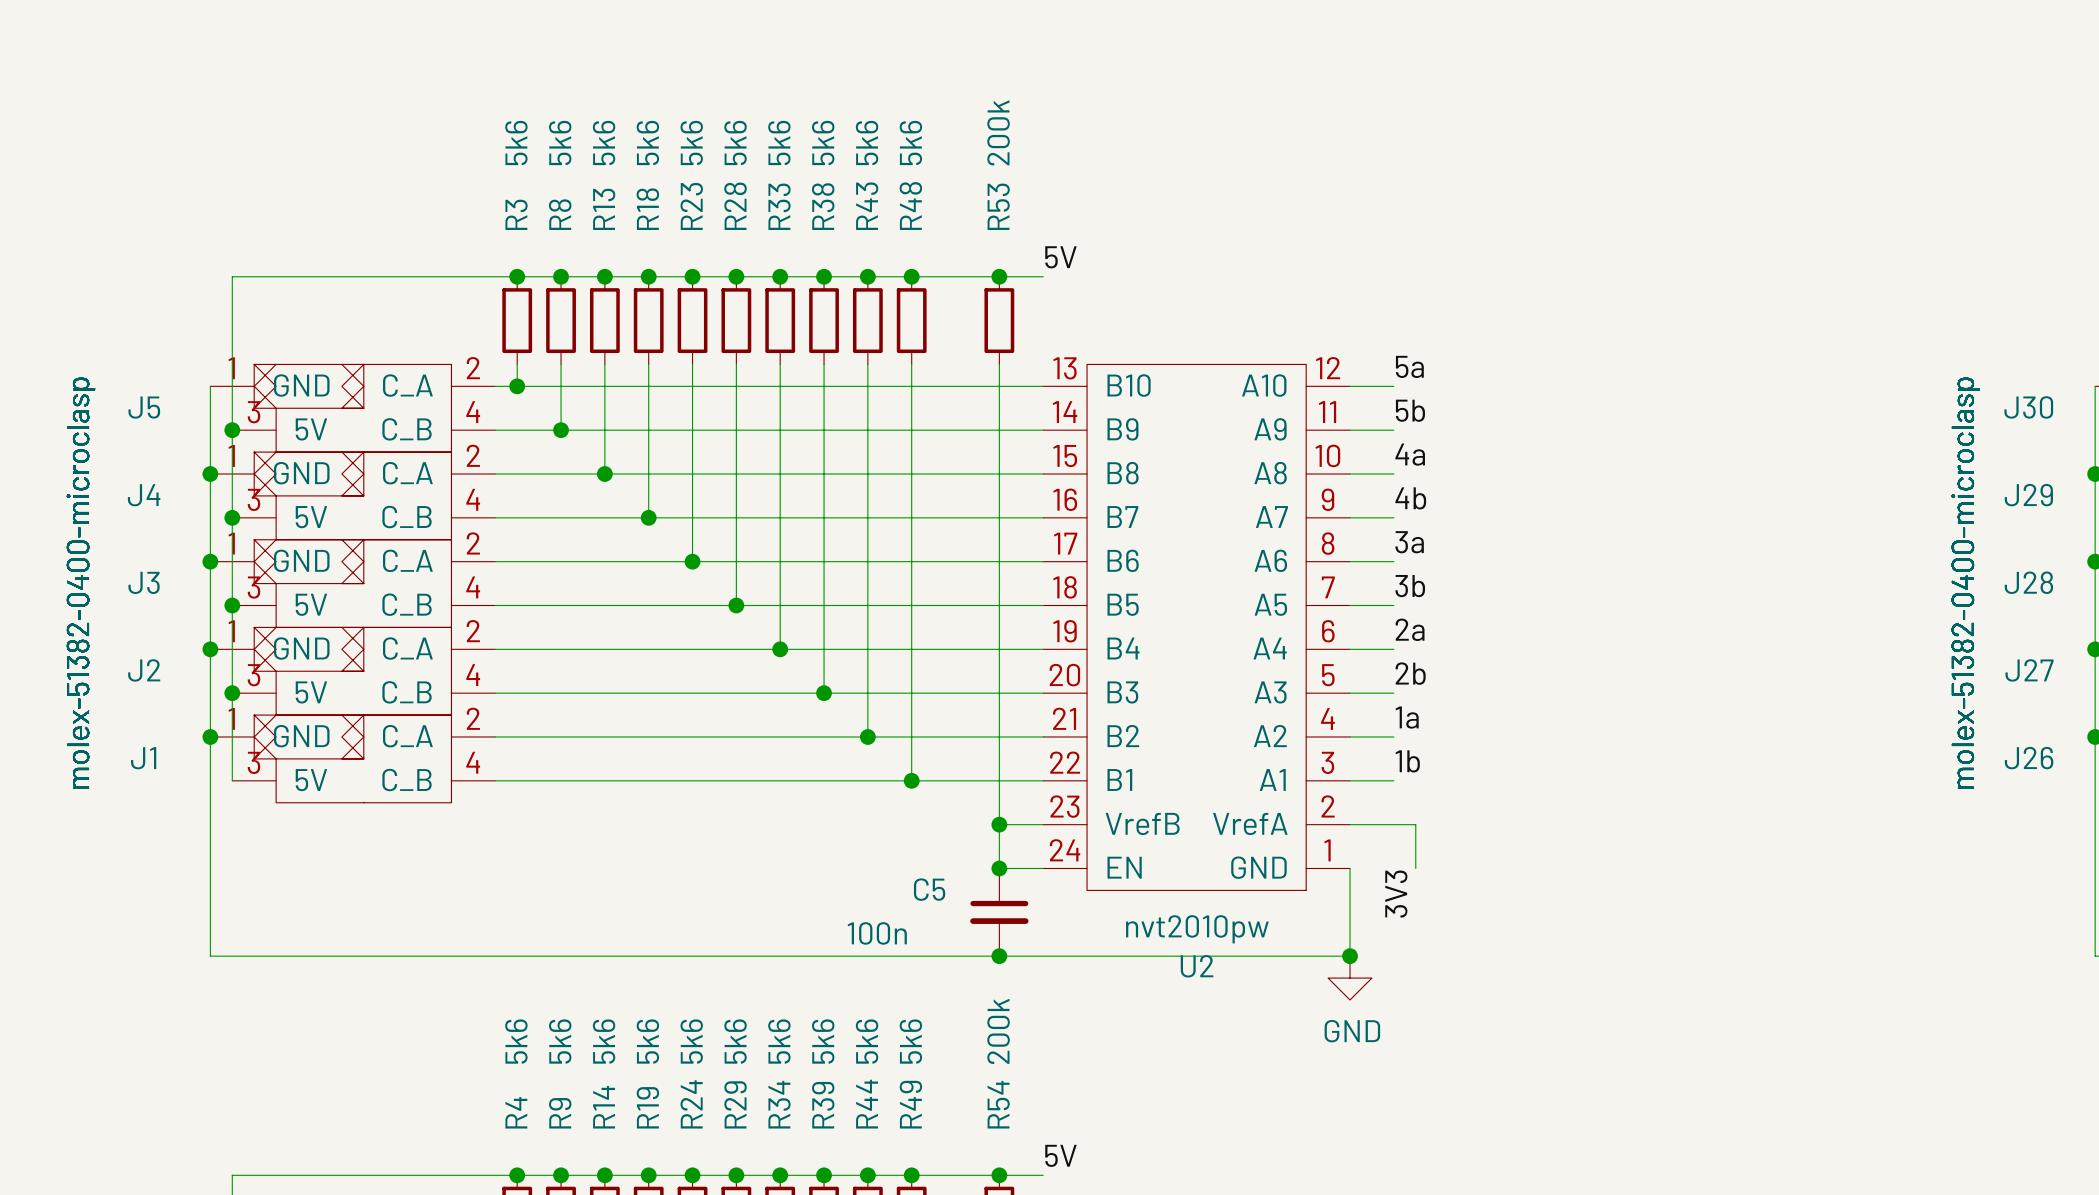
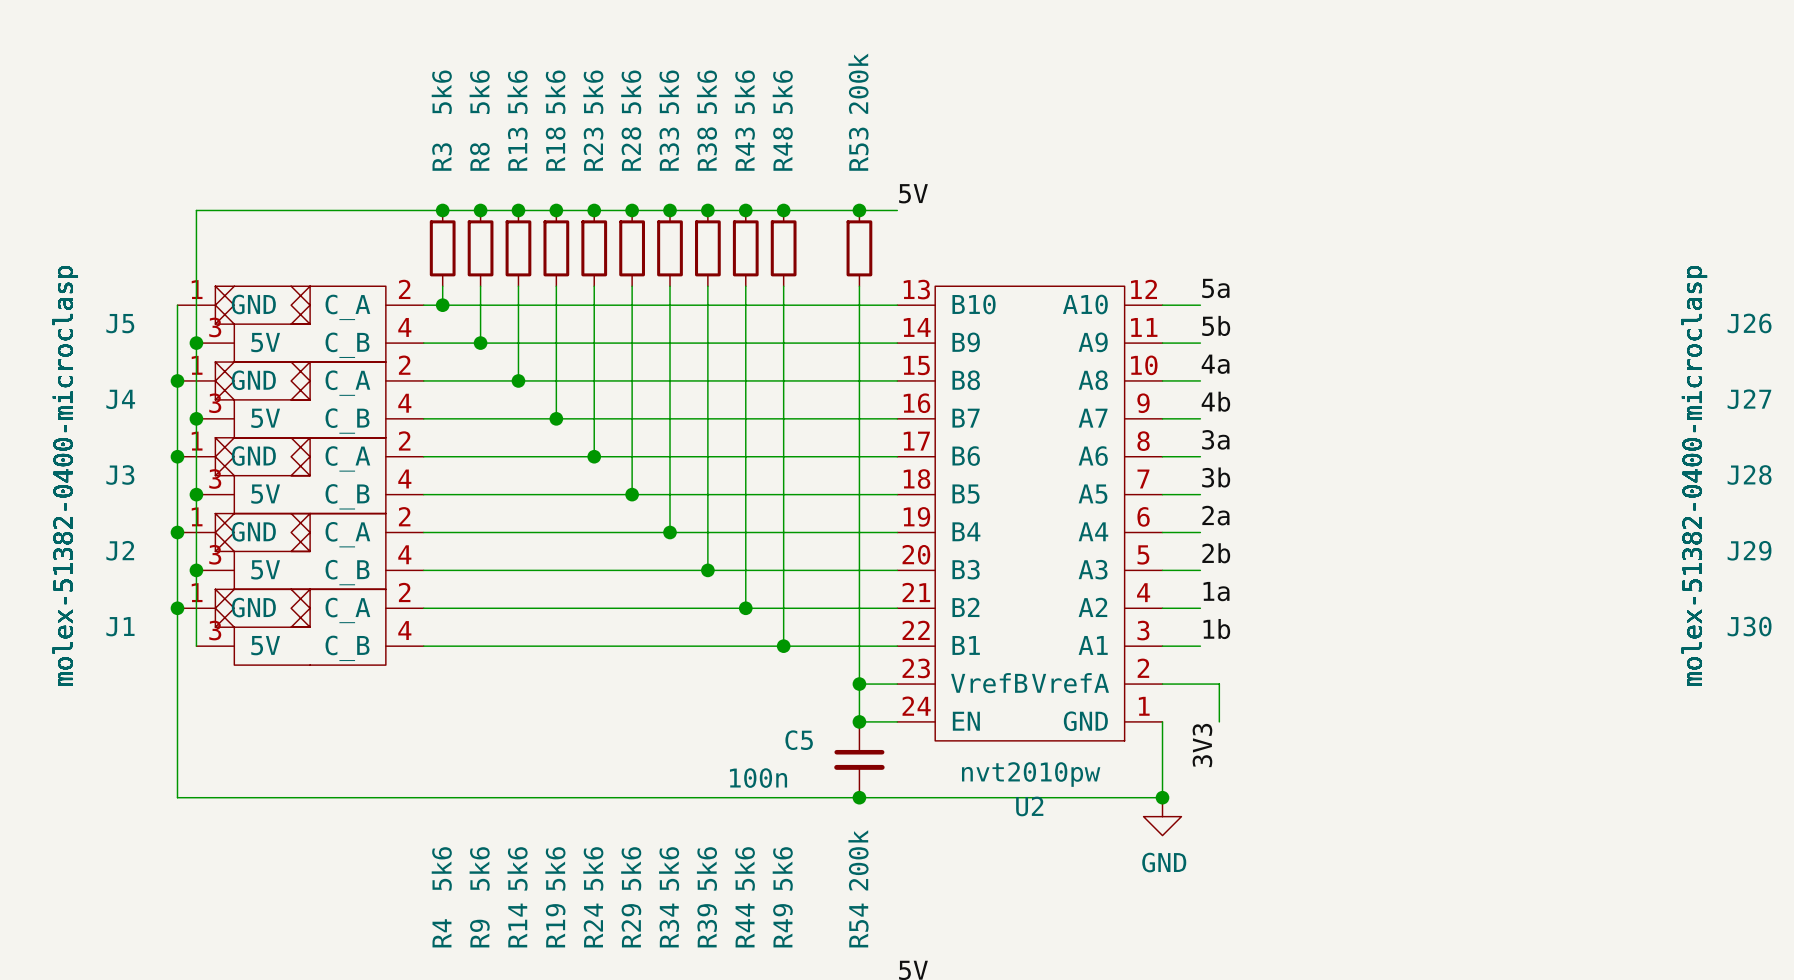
J30 name: J30 (2028, 407) -> J26 (1749, 323)
J29 name: J29 (2028, 495) -> J27 (1749, 399)
J27 name: J27 (2029, 670) -> J29 (1749, 550)
J26 name: J26 (2029, 758) -> J30 (1749, 626)

